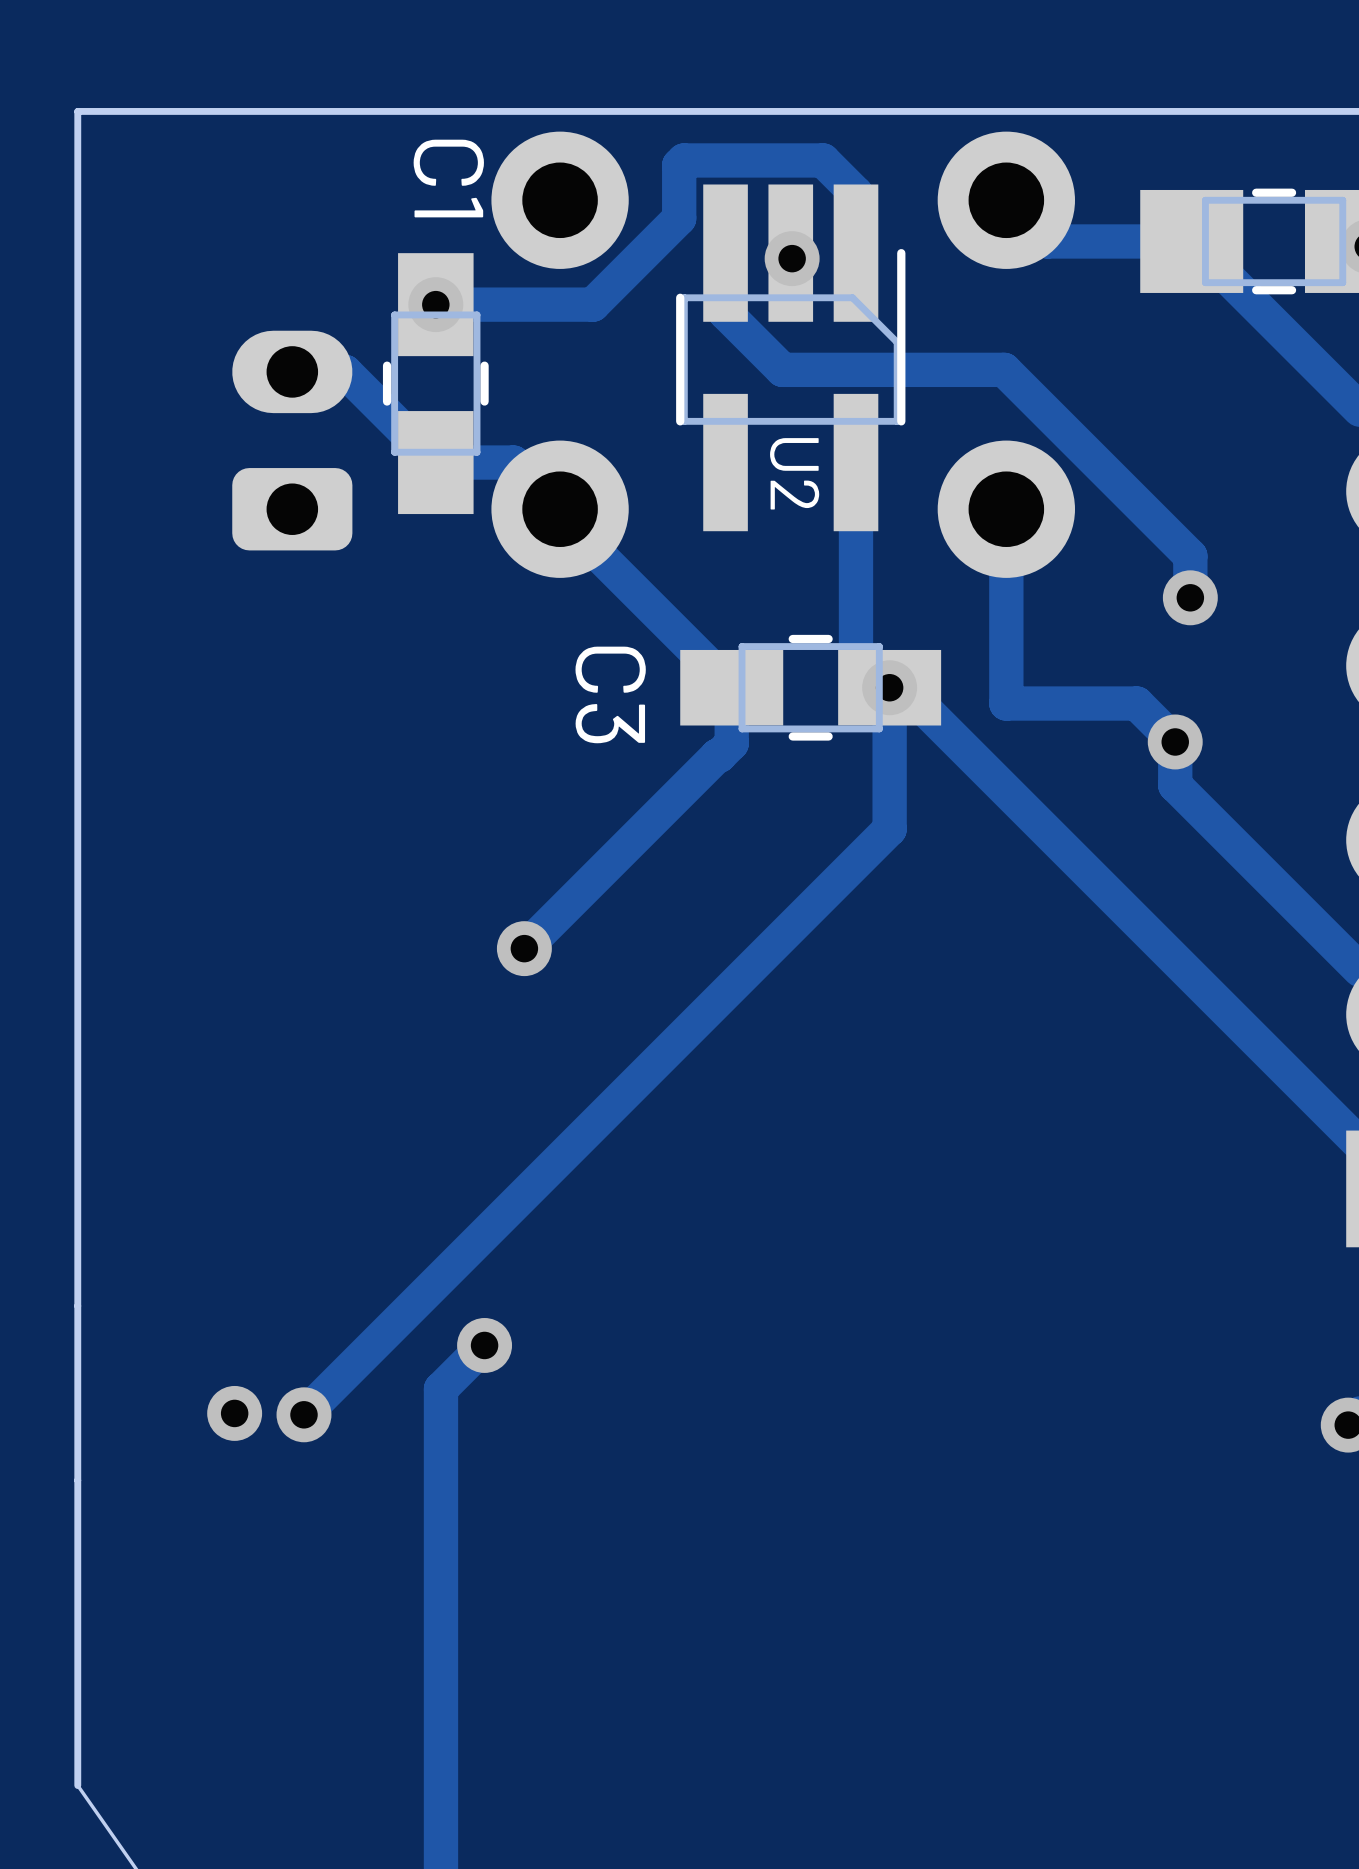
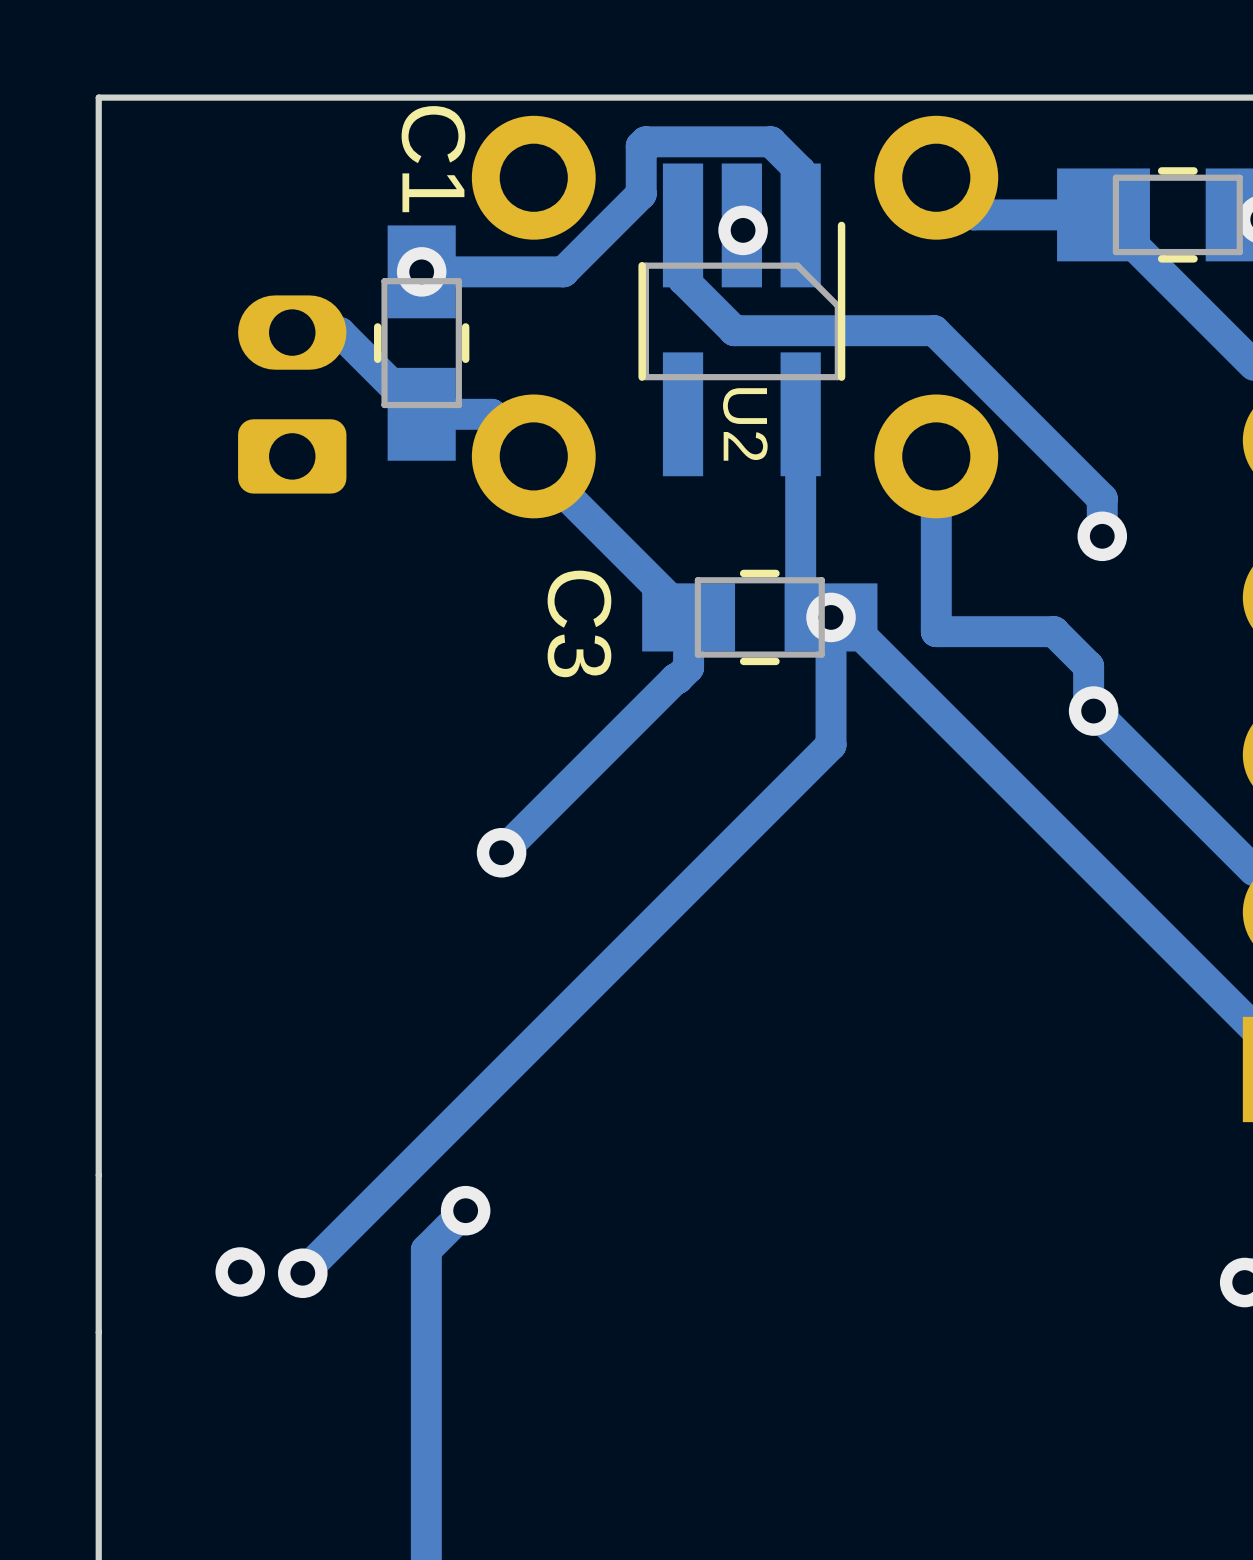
via position: (1175, 741) -> (1093, 711)

